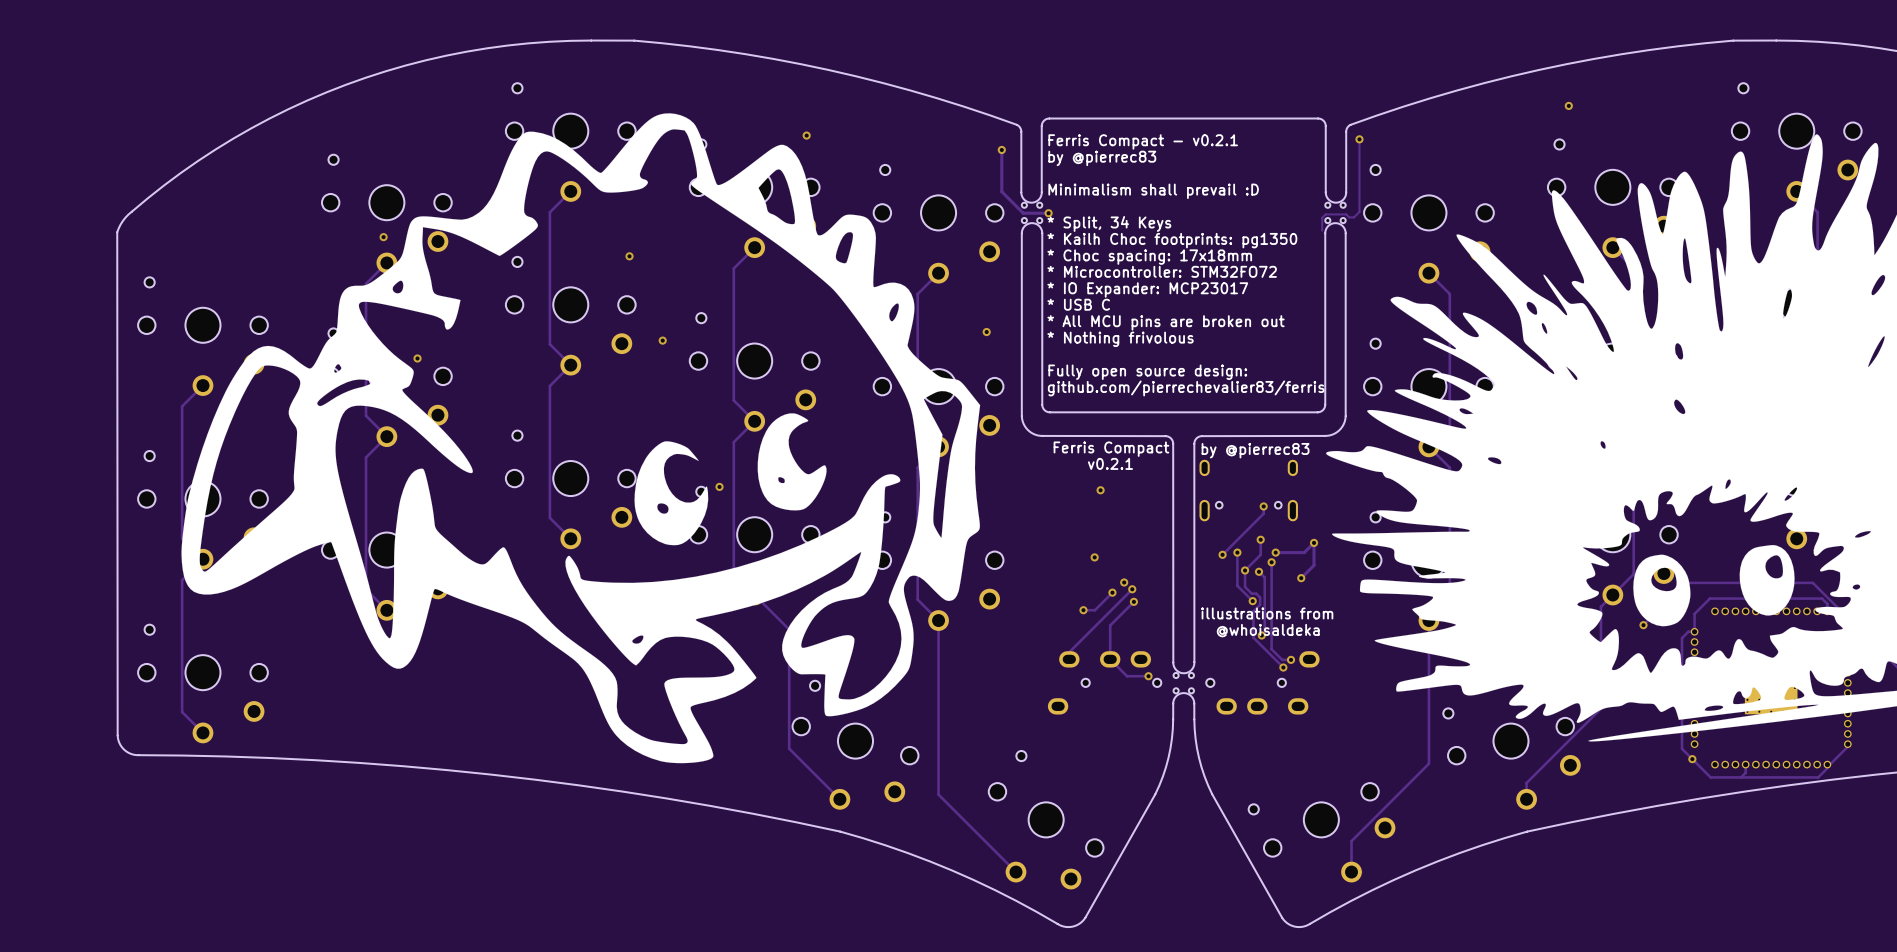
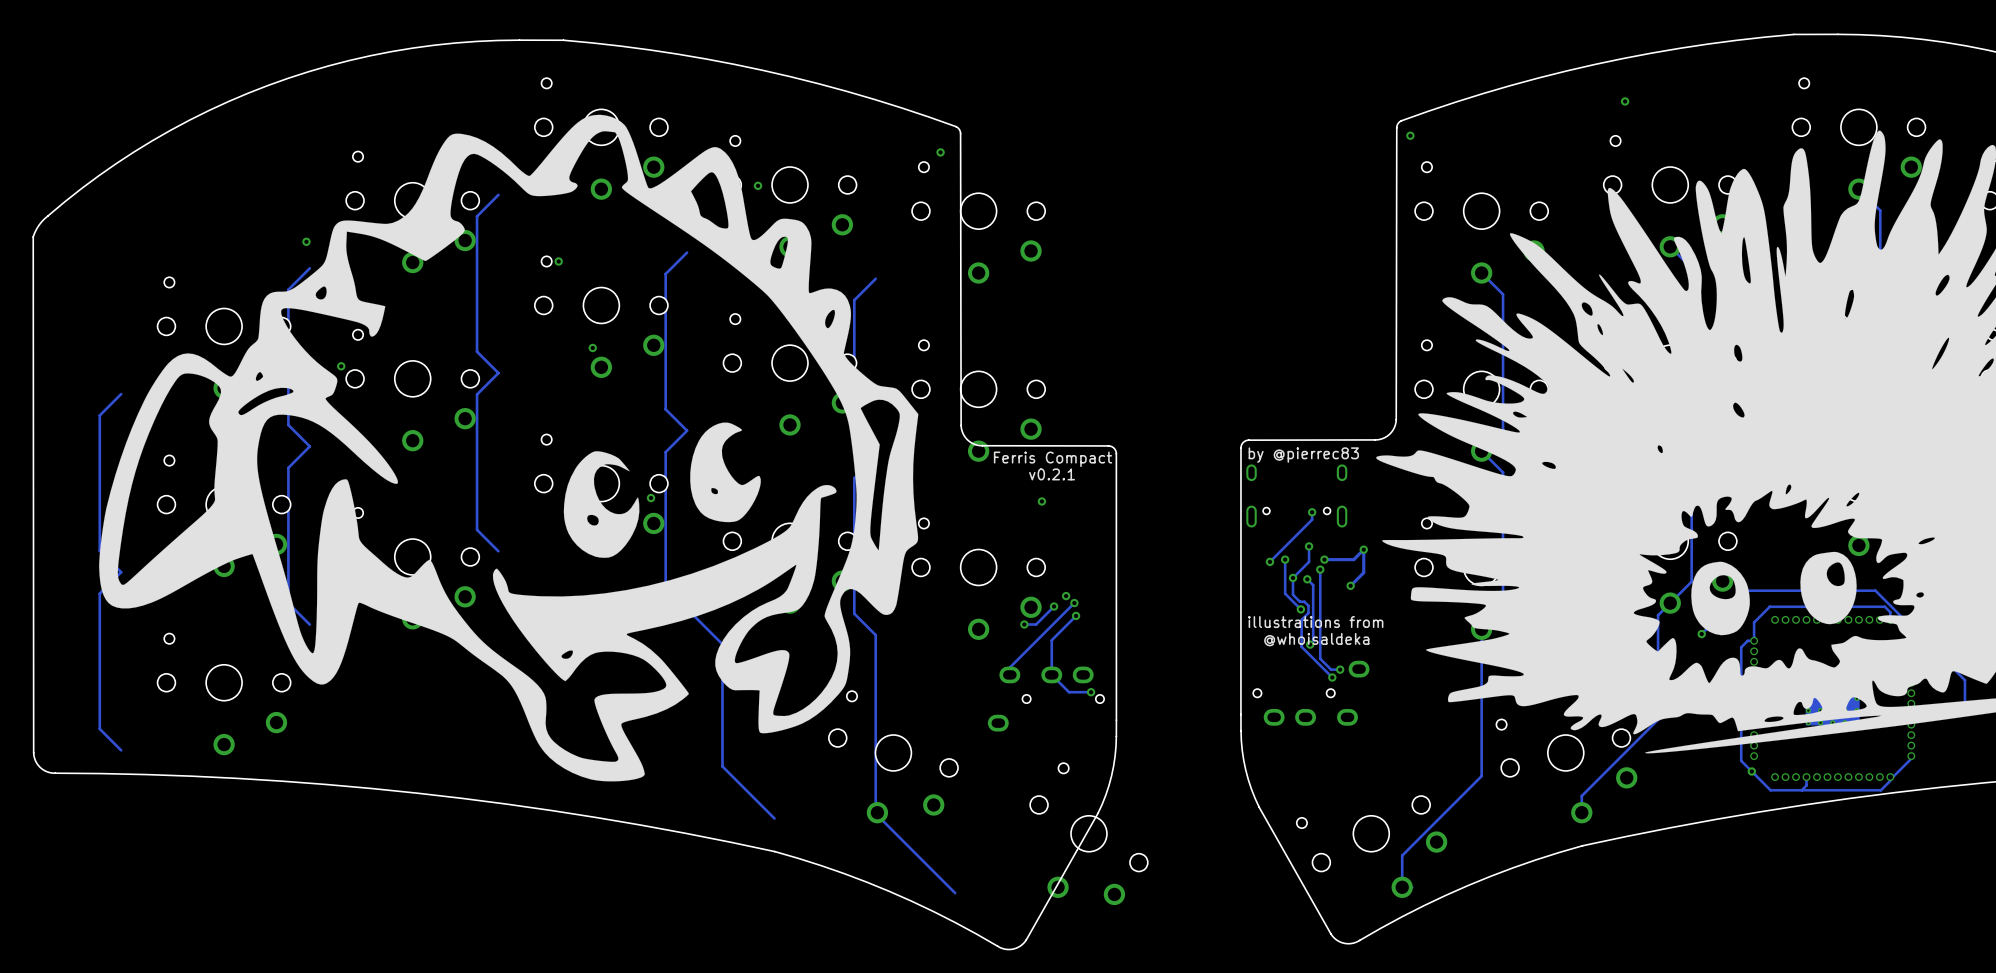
board edge: none -> (519, 40) (563, 40) (620, 46) (734, 64) (818, 83) (874, 99) (956, 126) (959, 130) (961, 425) (962, 433) (969, 441) (979, 445) (1108, 445) (1114, 448) (1116, 452) (1116, 736) (1113, 766) (1105, 794) (1098, 813) (1026, 939) (1019, 946) (1010, 949) (1001, 948) (911, 901) (821, 865) (774, 851) (685, 833) (551, 810) (417, 793) (236, 778) (52, 773) (42, 769) (36, 763) (33, 752) (33, 236) (39, 225) (81, 188) (152, 140) (208, 110) (268, 85) (329, 65) (391, 51) (455, 43) (519, 40)
board edge: (1346, 131) (1346, 193) (1342, 200) (1335, 202) (1329, 200) (1326, 194) (1325, 125) (1320, 118) (1047, 118) (1041, 125) (1041, 194) (1037, 200) (1030, 202) (1023, 199) (1021, 193) (1020, 127) (1016, 124) (963, 106) (855, 76) (800, 64) (717, 50) (634, 40) (528, 43) (466, 51) (405, 65) (346, 84) (307, 100) (251, 128) (198, 160) (128, 214) (117, 232) (117, 735) (122, 747) (130, 753) (315, 760) (447, 770) (622, 791) (753, 813) (840, 831) (907, 853) (994, 890) (1059, 924) (1070, 926) (1078, 924) (1085, 917) (1159, 785) (1170, 748) (1174, 698) (1179, 693) (1186, 693) (1192, 697) (1194, 703) -> (1396, 127) (1396, 419)
via: (806, 135) -> none
track: (1359, 139) (1359, 211) (1354, 217) (1349, 217) (1346, 214) (1325, 214) (1322, 217) (1322, 230) -> none
text: Ferris Compact - v0.2.1 (1143, 141) -> none
track: (1001, 149) (1001, 191) (1023, 213) (1048, 213) -> none
via: (1001, 149) -> none
via: none -> (940, 152)
text: by @pierrec83 (1102, 158) -> none
track: (570, 191) (549, 212) (549, 344) (570, 365) (549, 385) (549, 517) (570, 538) -> (498, 194) (477, 216) (477, 351) (498, 373) (477, 394) (477, 529) (498, 551)
text: Minimalism shall prevail :D (1153, 191) -> none
part: (1032, 212) -> none
part: (1335, 212) -> none
via: (1048, 213) -> none
text: * Split, 34 Keys (1109, 223) -> none
via: (383, 237) -> none
text: * Kailh Choc footprints: pg1350 (1172, 240) -> none
via: none -> (306, 241)
track: (754, 247) (733, 268) (733, 400) (754, 421) (733, 442) (733, 574) (789, 629) (789, 748) (839, 799) -> (687, 252) (665, 273) (665, 409) (687, 430) (665, 452) (665, 587) (722, 644) (722, 766) (774, 818)
via: (629, 256) -> none
text: * Choc spacing: 17x18mm (1149, 257) -> none
via: none -> (558, 261)
track: (386, 262) (366, 283) (366, 415) (386, 436) (366, 457) (366, 589) (386, 610) -> (309, 268) (288, 289) (288, 425) (309, 446) (288, 467) (288, 603) (309, 624)
text: * Microcontroller: STM32FO72 (1162, 271) -> none
track: (938, 273) (917, 294) (917, 426) (938, 446) (917, 467) (917, 599) (938, 620) (938, 794) (1016, 872) -> (875, 278) (854, 300) (854, 435) (875, 456) (854, 478) (854, 613) (875, 635) (875, 813) (955, 893)
text: * IO Expander: MCP23017 (1147, 289) -> none
text: * USB C (1078, 304) -> none
text: * All MCU pins are broken out (1166, 322) -> none
via: (986, 332) -> none
text: * Nothing frivolous (1120, 339) -> none
via: (662, 340) -> none
via: none -> (592, 347)
via: (417, 358) -> none
via: none -> (341, 366)
text: Fully open source design: (1147, 372) -> none
track: (202, 385) (182, 406) (182, 538) (202, 559) (182, 580) (182, 712) (202, 732) -> (121, 394) (99, 415) (99, 550) (121, 572) (99, 593) (99, 728) (121, 750)
text: github.com/pierrechevalier83/ferris (1186, 388) -> none
board edge: (1345, 416) (1345, 233) (1340, 224) (1330, 224) (1325, 232) (1325, 404) (1323, 410) (1317, 412) (1046, 411) (1042, 404) (1042, 232) (1035, 223) (1025, 225) (1021, 233) (1022, 421) (1030, 432) (1039, 435) (1165, 436) (1172, 439) (1173, 663) (1175, 669) (1182, 673) (1190, 671) (1194, 663) (1194, 443) -> (1240, 714) (1240, 448)
drawing position: (580, 438) -> (508, 448)
text position: Ferris Compact (1111, 449) -> Ferris Compact (1053, 459)
text position: v0.2.1 (1110, 463) -> v0.2.1 (1052, 474)
via: (1100, 490) -> none
via: none -> (651, 498)
via: none -> (1041, 501)
via: (1094, 557) -> none
via: (1124, 582) -> none
via: none -> (1066, 596)
track: (1132, 589) (1069, 652) (1069, 659) -> (1074, 603) (1009, 667) (1009, 674)
via: (1132, 589) -> none
track: (1112, 592) (1094, 610) (1083, 610) -> (1054, 606) (1036, 624) (1024, 624)
via: (1112, 592) -> none
via: none -> (1074, 603)
via: none -> (1054, 606)
track: (1133, 601) (1110, 625) (1110, 659) (1127, 676) (1148, 676) -> (1076, 615) (1051, 640) (1051, 674) (1069, 692) (1091, 692)
via: (1133, 601) -> none
via: none -> (1076, 615)
via: (1083, 610) -> none
via: none -> (1024, 624)
via: (1148, 676) -> none
via: none -> (1091, 692)
part position: (1104, 682) -> (1045, 699)
part: (1183, 683) -> none

